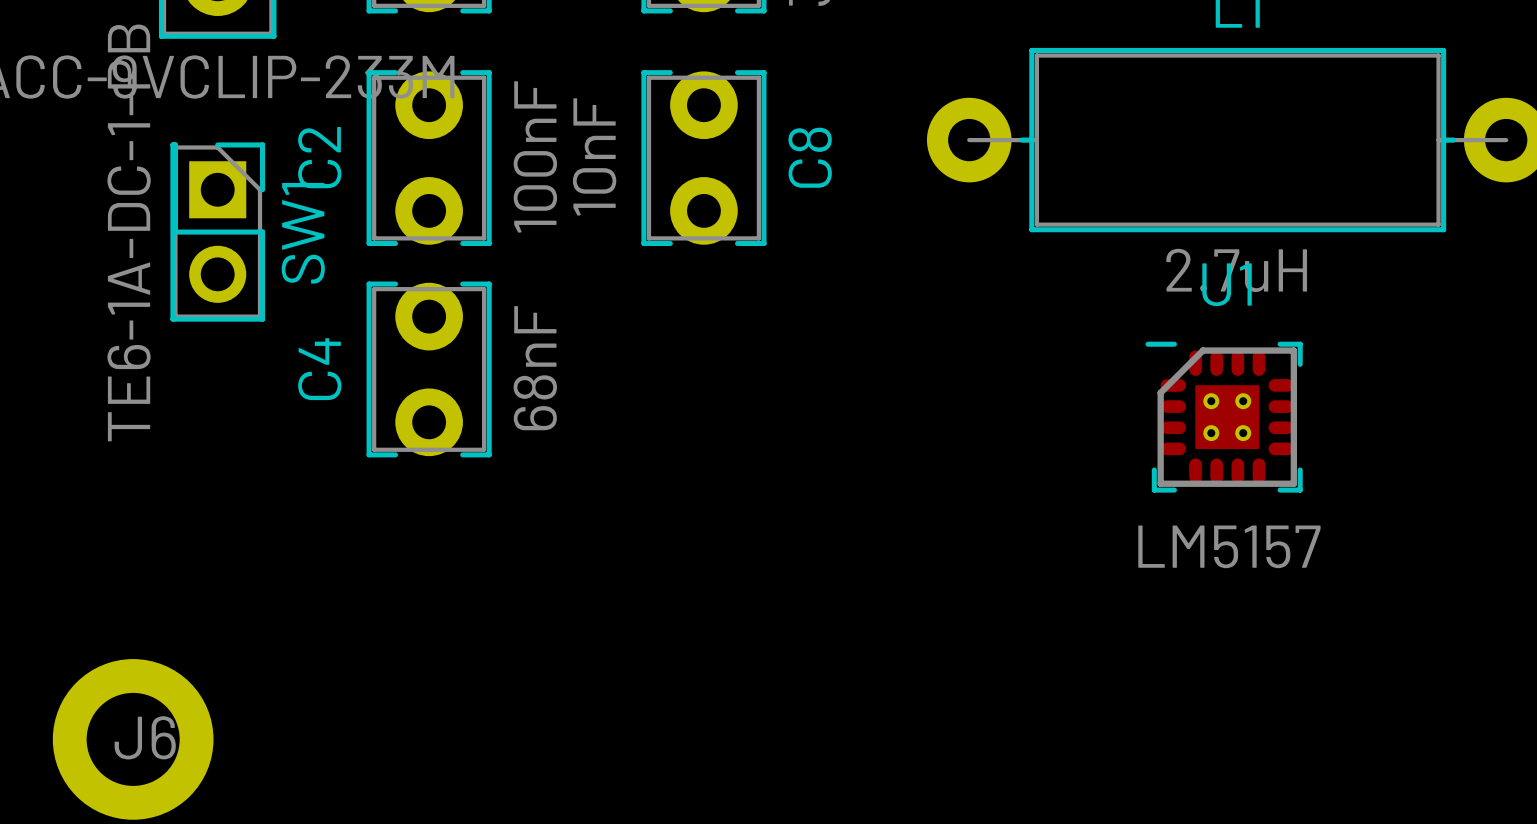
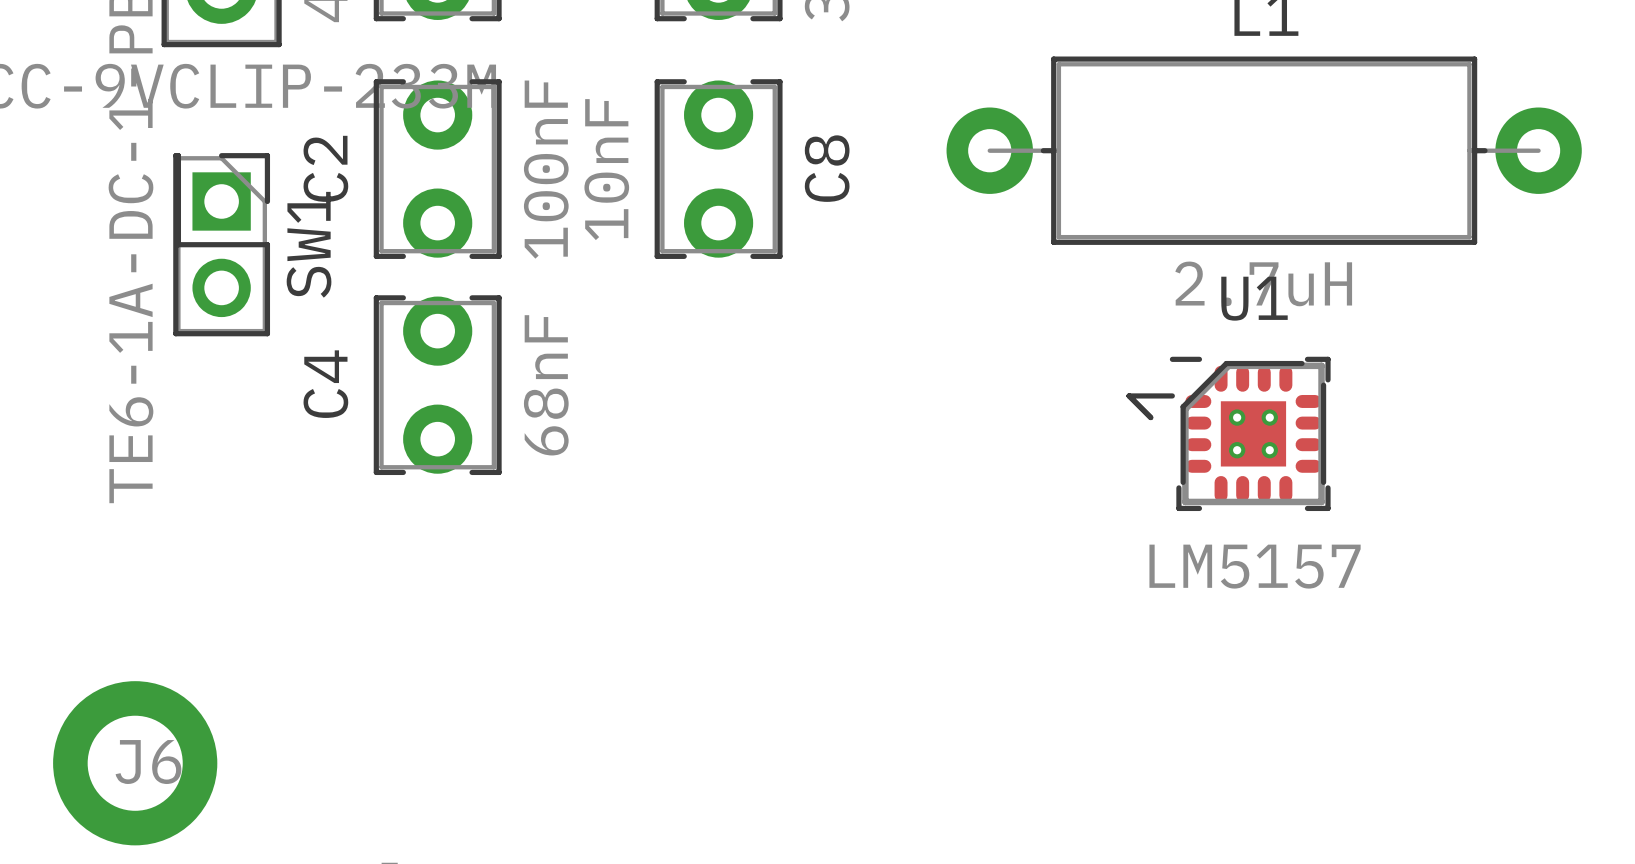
line: none -> (1301, 363) (1226, 363) (1183, 406) (1183, 482)
line: none -> (1323, 385) (1323, 482)
line: none -> (1172, 395) (1129, 395) (1150, 417)

